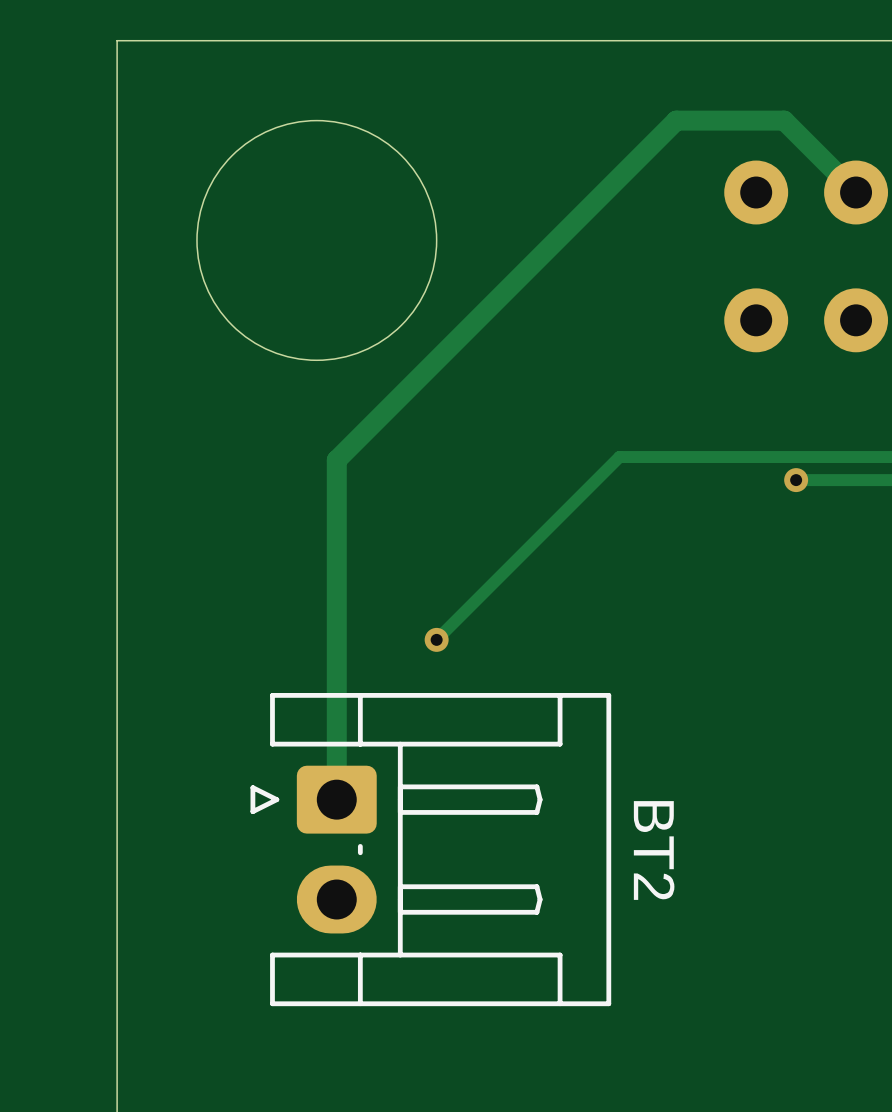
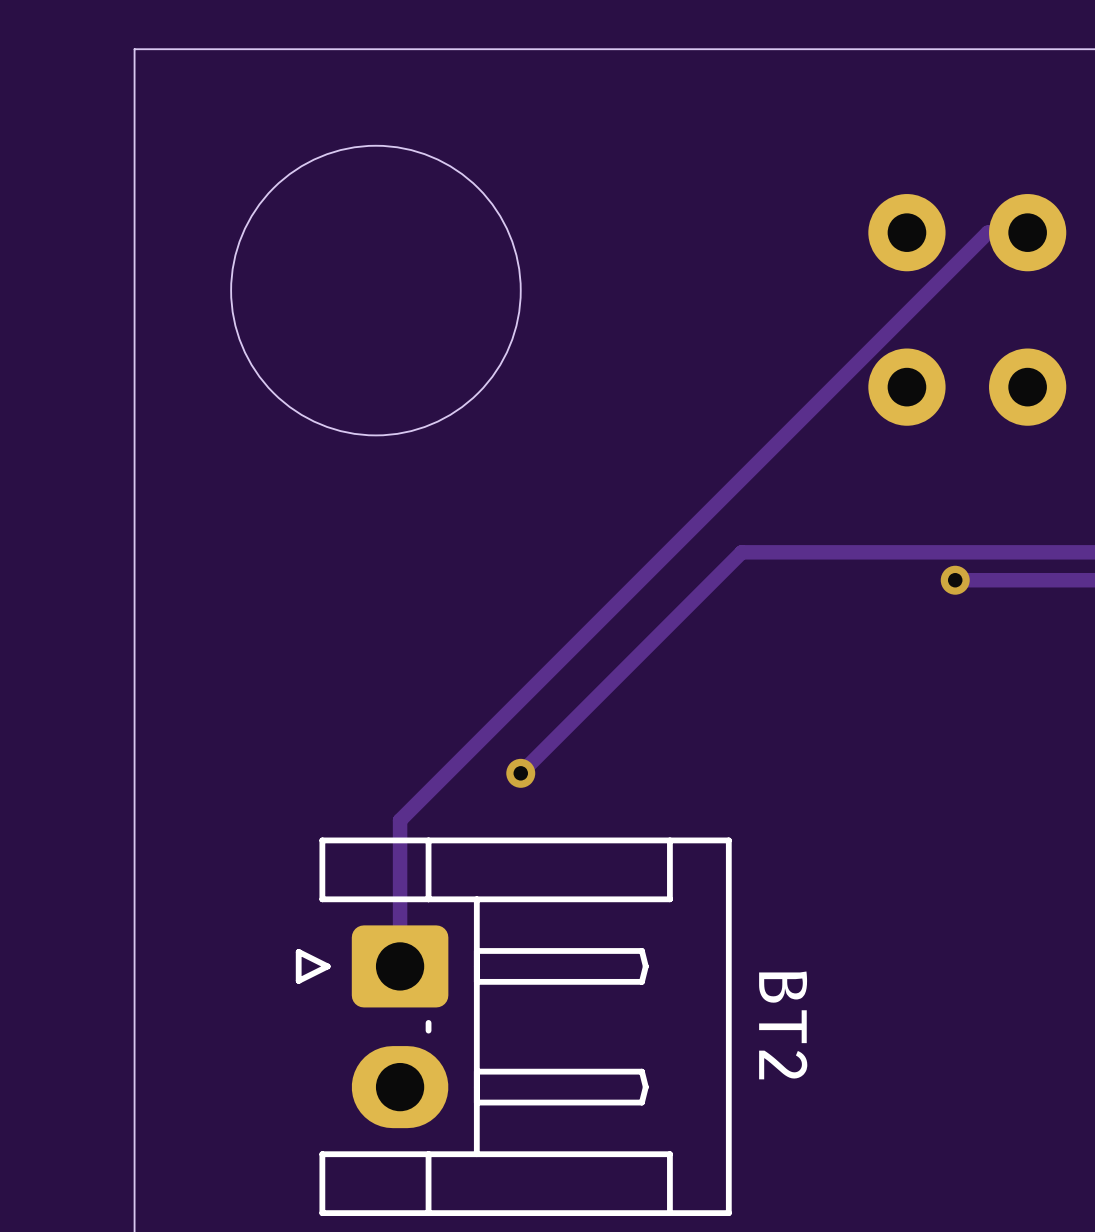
track: (856, 192) (784, 120) (676, 120) (336, 460) (336, 678) -> (1027, 232) (987, 232) (400, 820)
track width: thick (336, 678) (336, 799) -> thin (400, 820) (400, 966)

